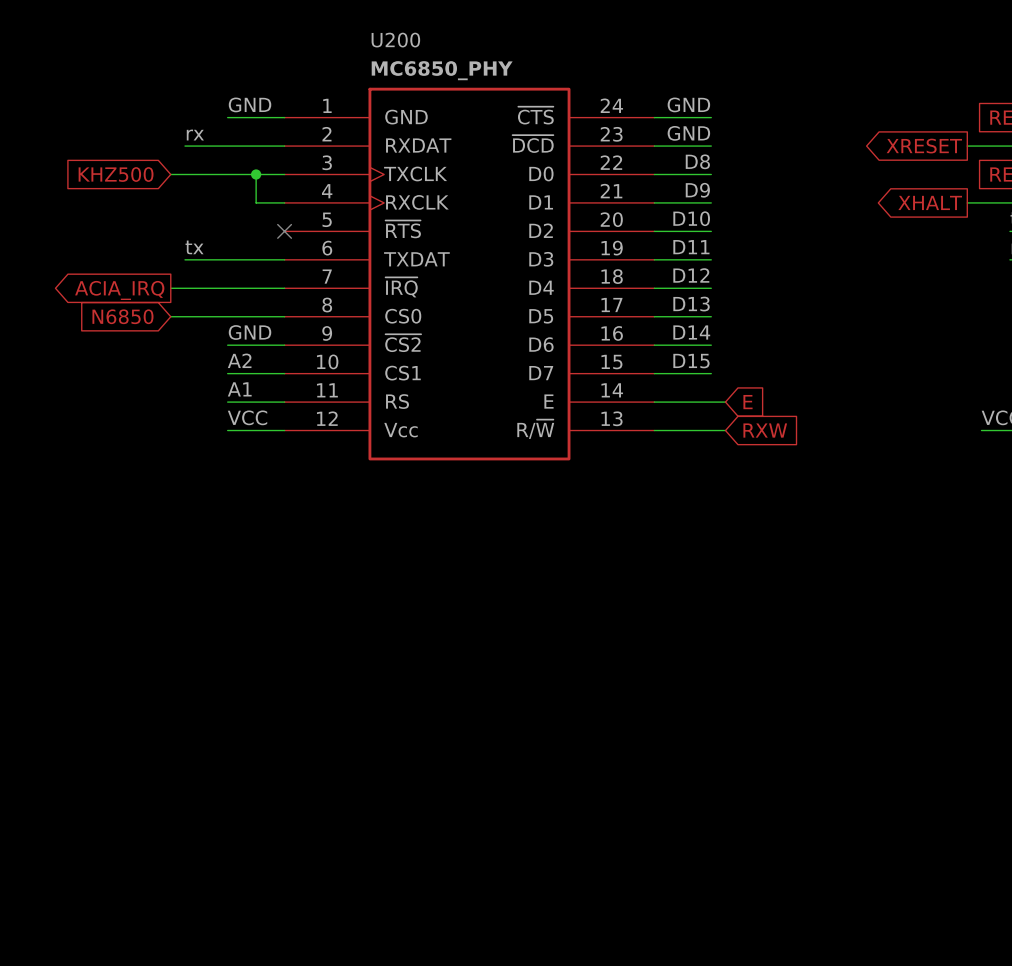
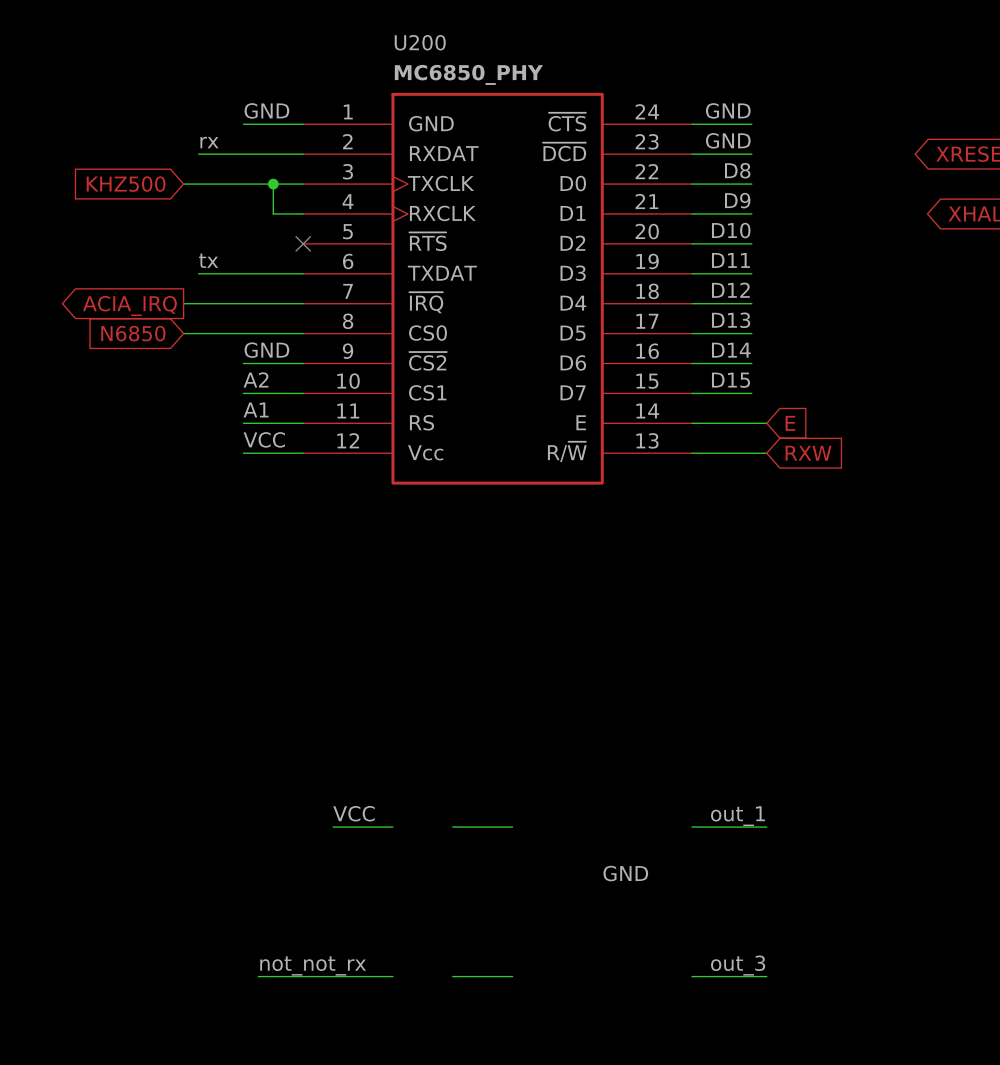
label: none -> VCC (354, 813)
label: none -> out_1 (737, 816)
wire: none -> (333, 827) (392, 827)
wire: none -> (452, 827) (512, 827)
wire: none -> (692, 827) (766, 827)
label: none -> GND (625, 873)
label: none -> out_3 (738, 965)
label: none -> not_not_rx (313, 965)
wire: none -> (258, 976) (392, 976)
wire: none -> (452, 976) (512, 976)
wire: none -> (692, 976) (766, 976)

